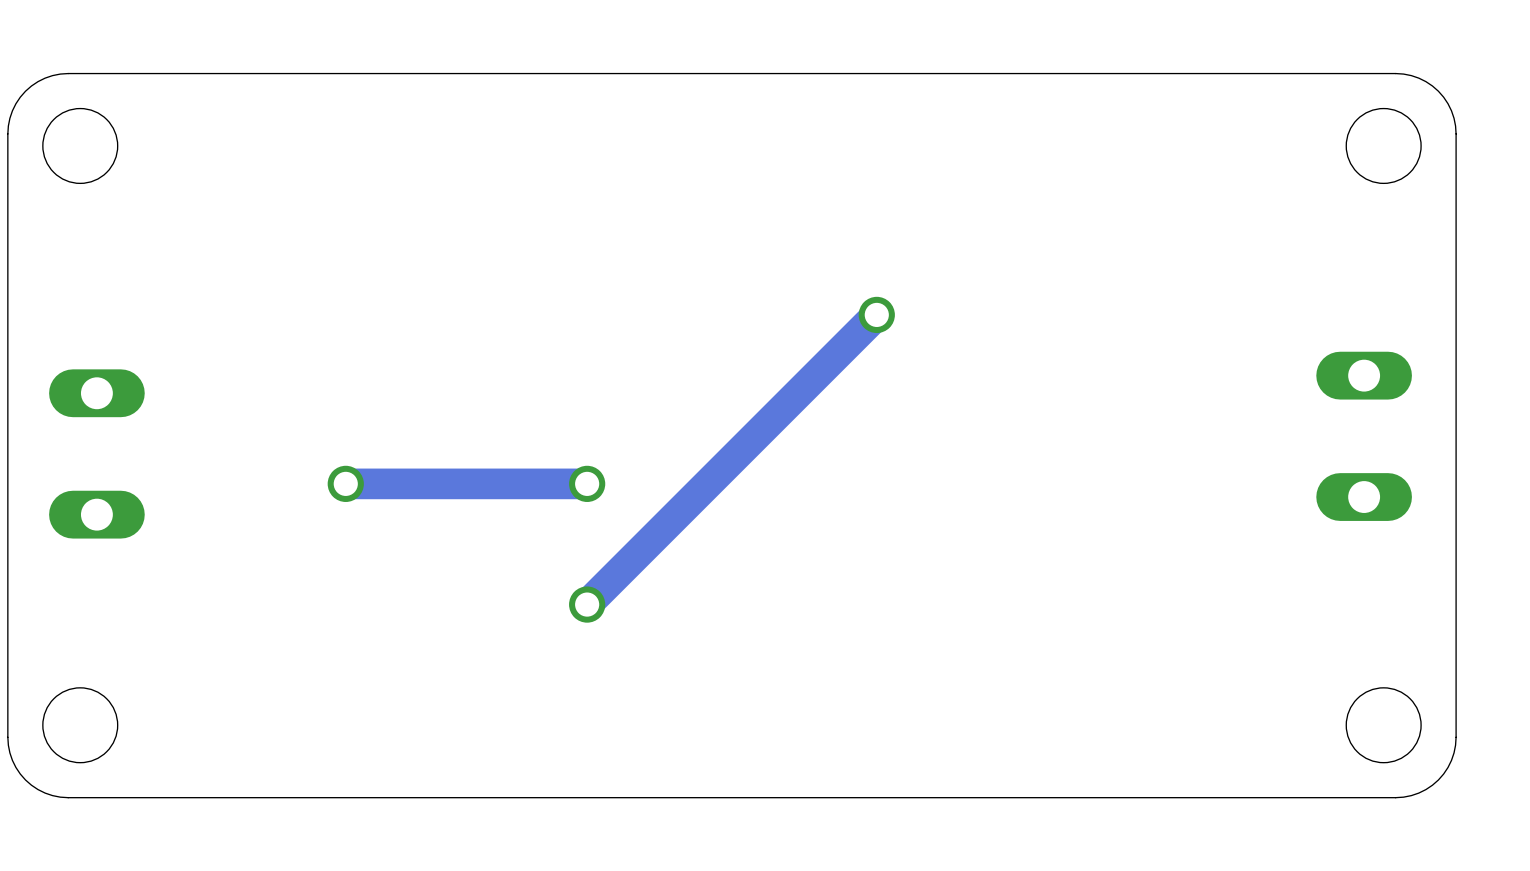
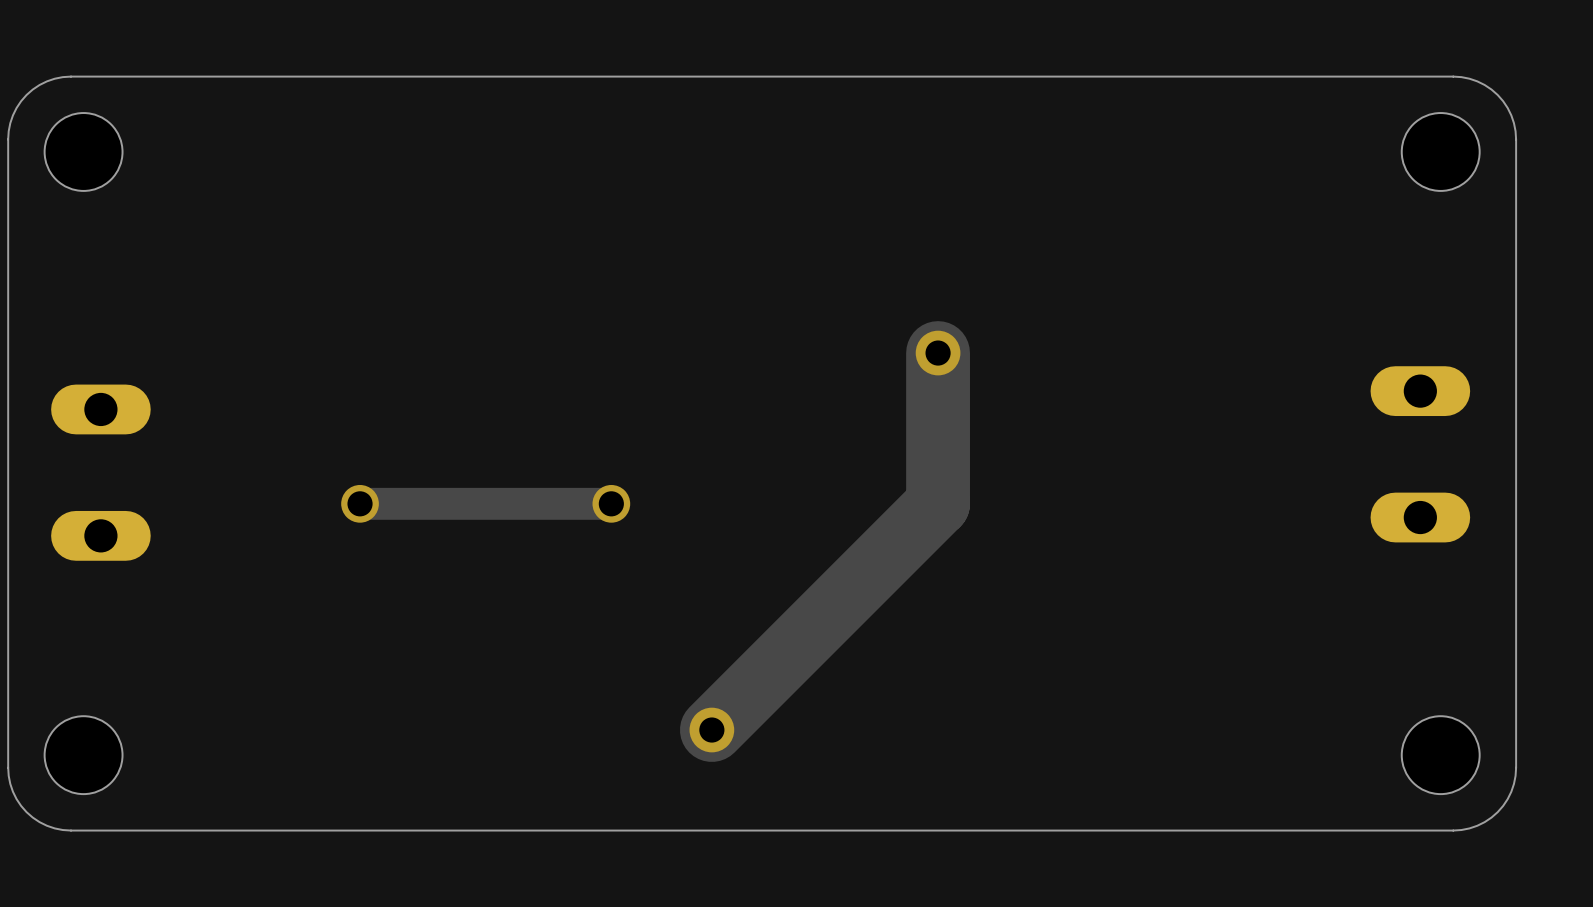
track: (876, 314) (587, 604) -> none
via: (876, 314) -> none
track: none -> (938, 353) (938, 503) (711, 730)
via: none -> (938, 353)
via: (587, 604) -> none
via: none -> (711, 730)

